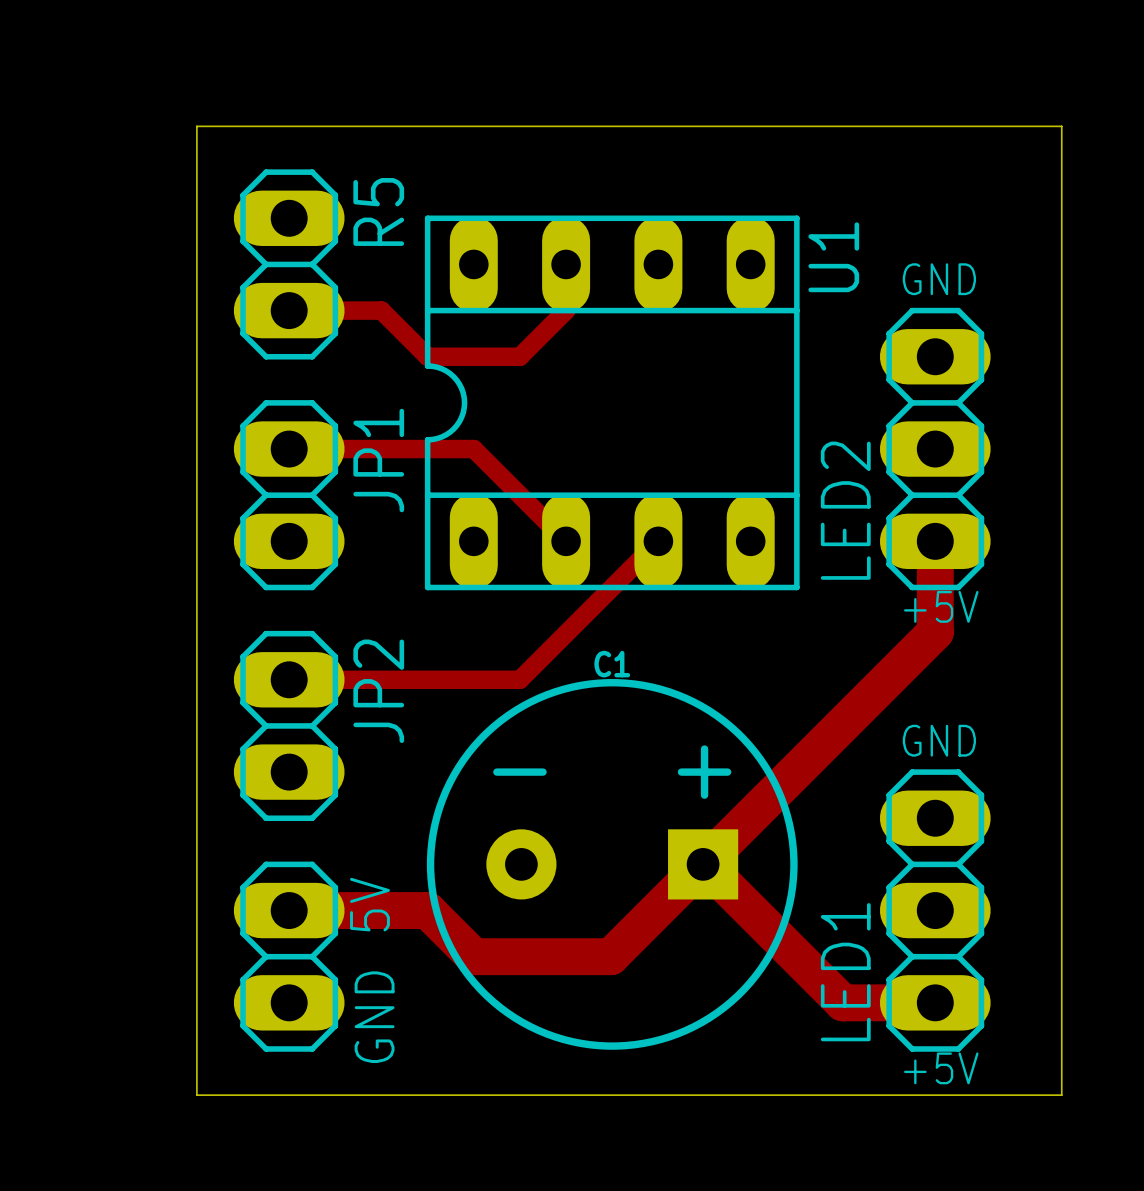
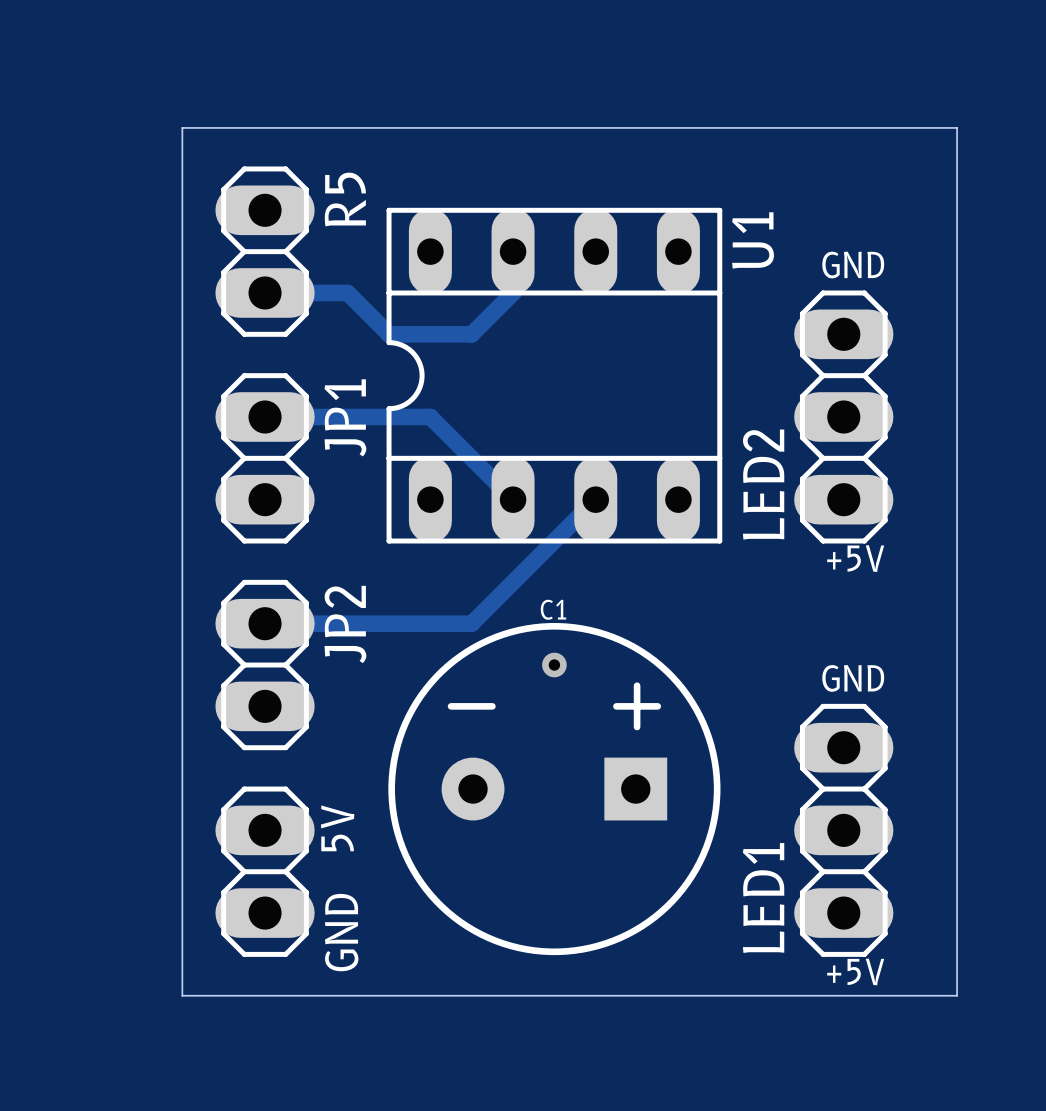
track: (935, 541) (935, 632) (610, 956) (473, 956) (427, 910) (289, 910) -> none
via: none -> (554, 665)
track: (703, 864) (843, 1002) (935, 1002) -> none

